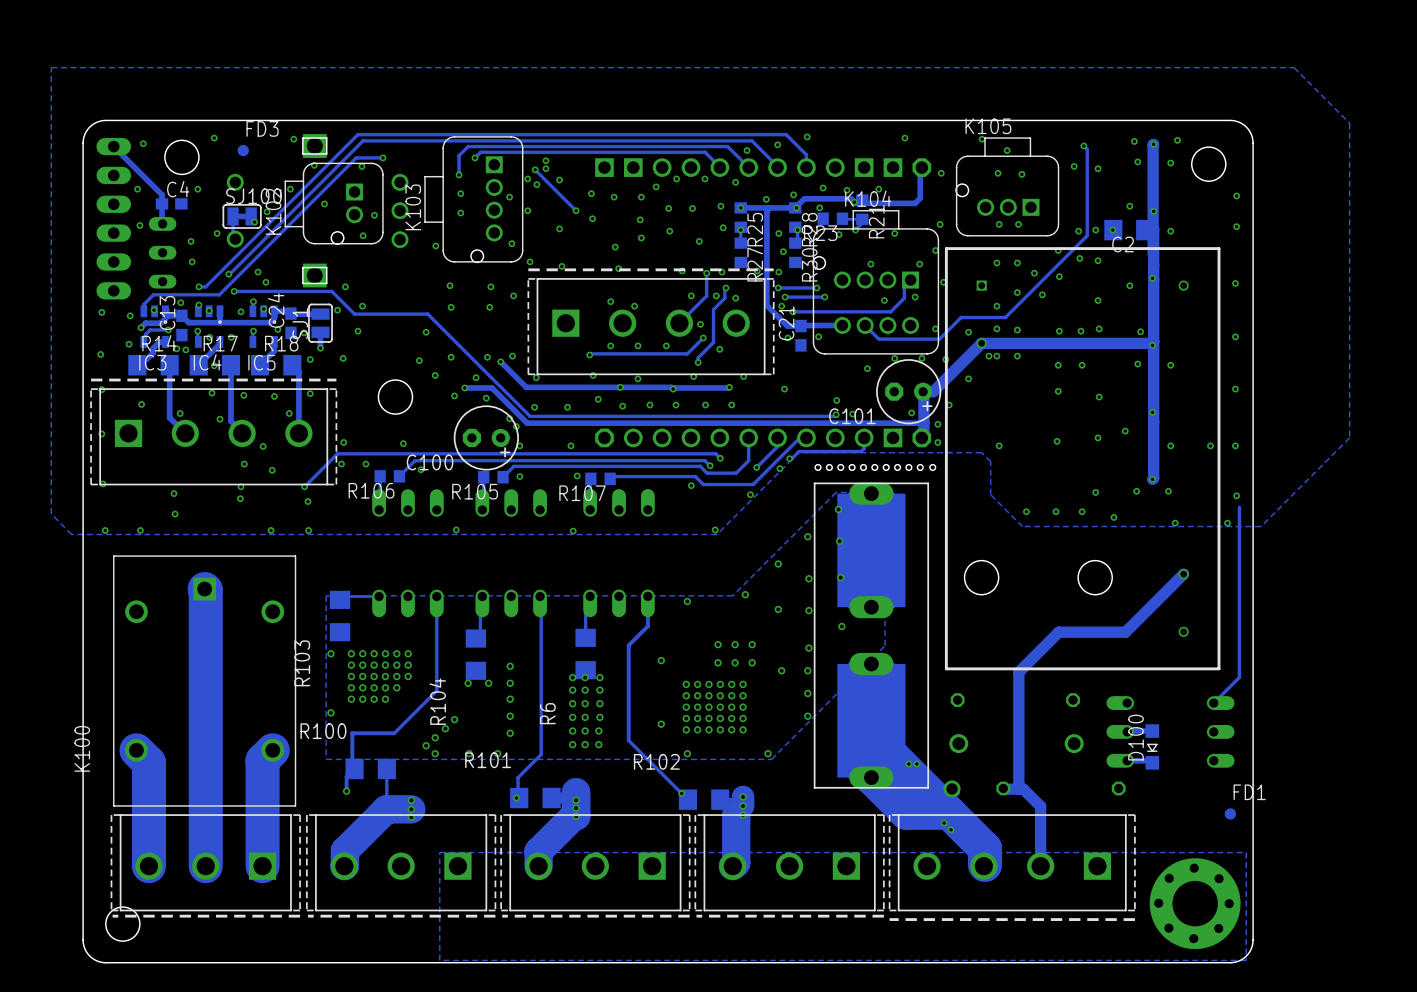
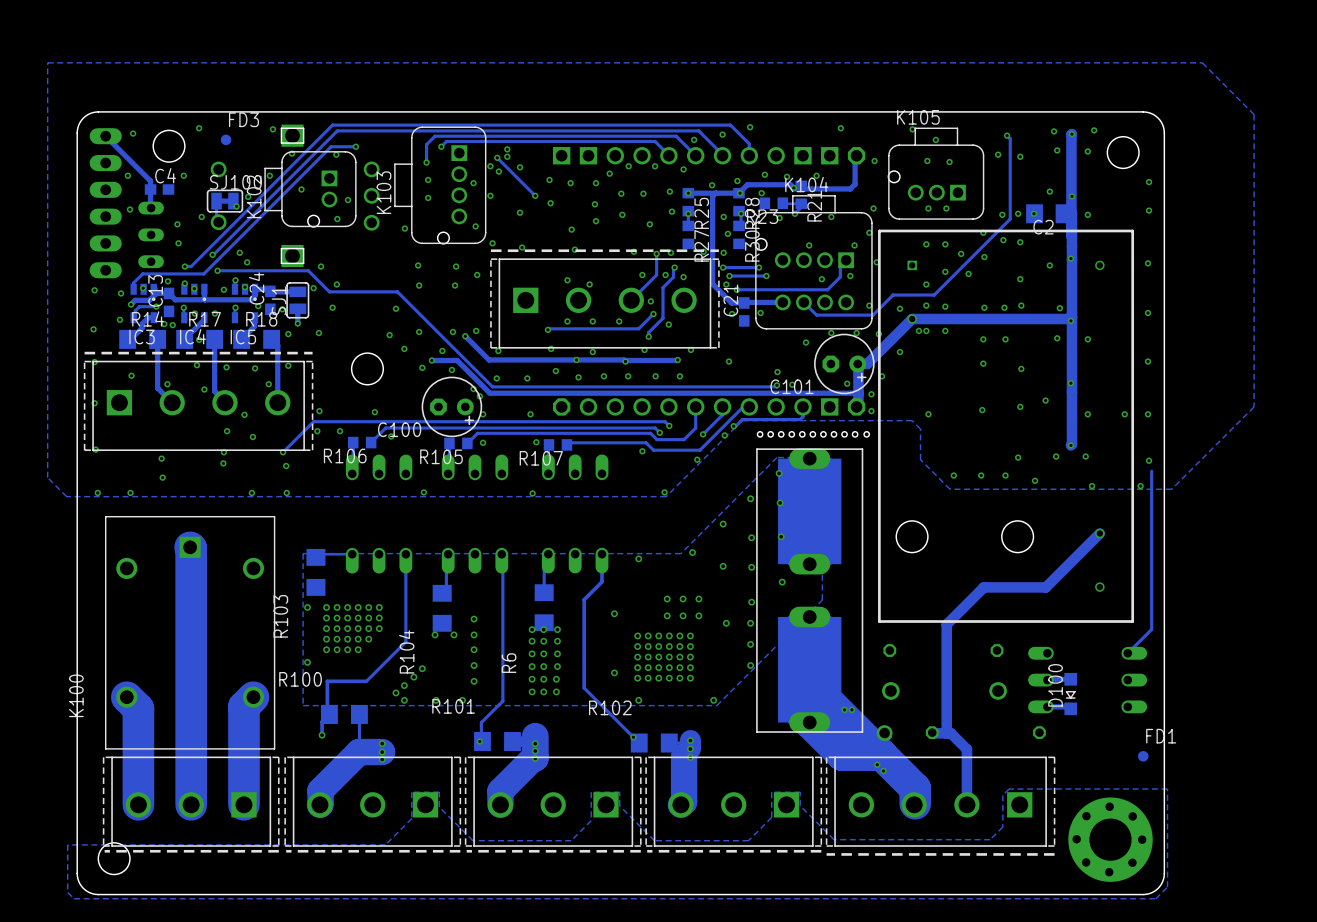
zone outline: (636, 852) (472, 852) -> (591, 792) (591, 820) (571, 840) (473, 840) (439, 806) (439, 792)
zone outline: (830, 852) (666, 852) -> (771, 792) (771, 817) (748, 840) (654, 840) (619, 805) (619, 792)
zone outline: (861, 852) (1246, 852) (1246, 960) (439, 960) (439, 852) (443, 852) -> (800, 792) (800, 805) (833, 839) (990, 839) (1002, 827) (1002, 795) (1009, 789) (1167, 789) (1167, 887) (1155, 898) (74, 898) (67, 892) (67, 844) (385, 844) (411, 818) (411, 792)

